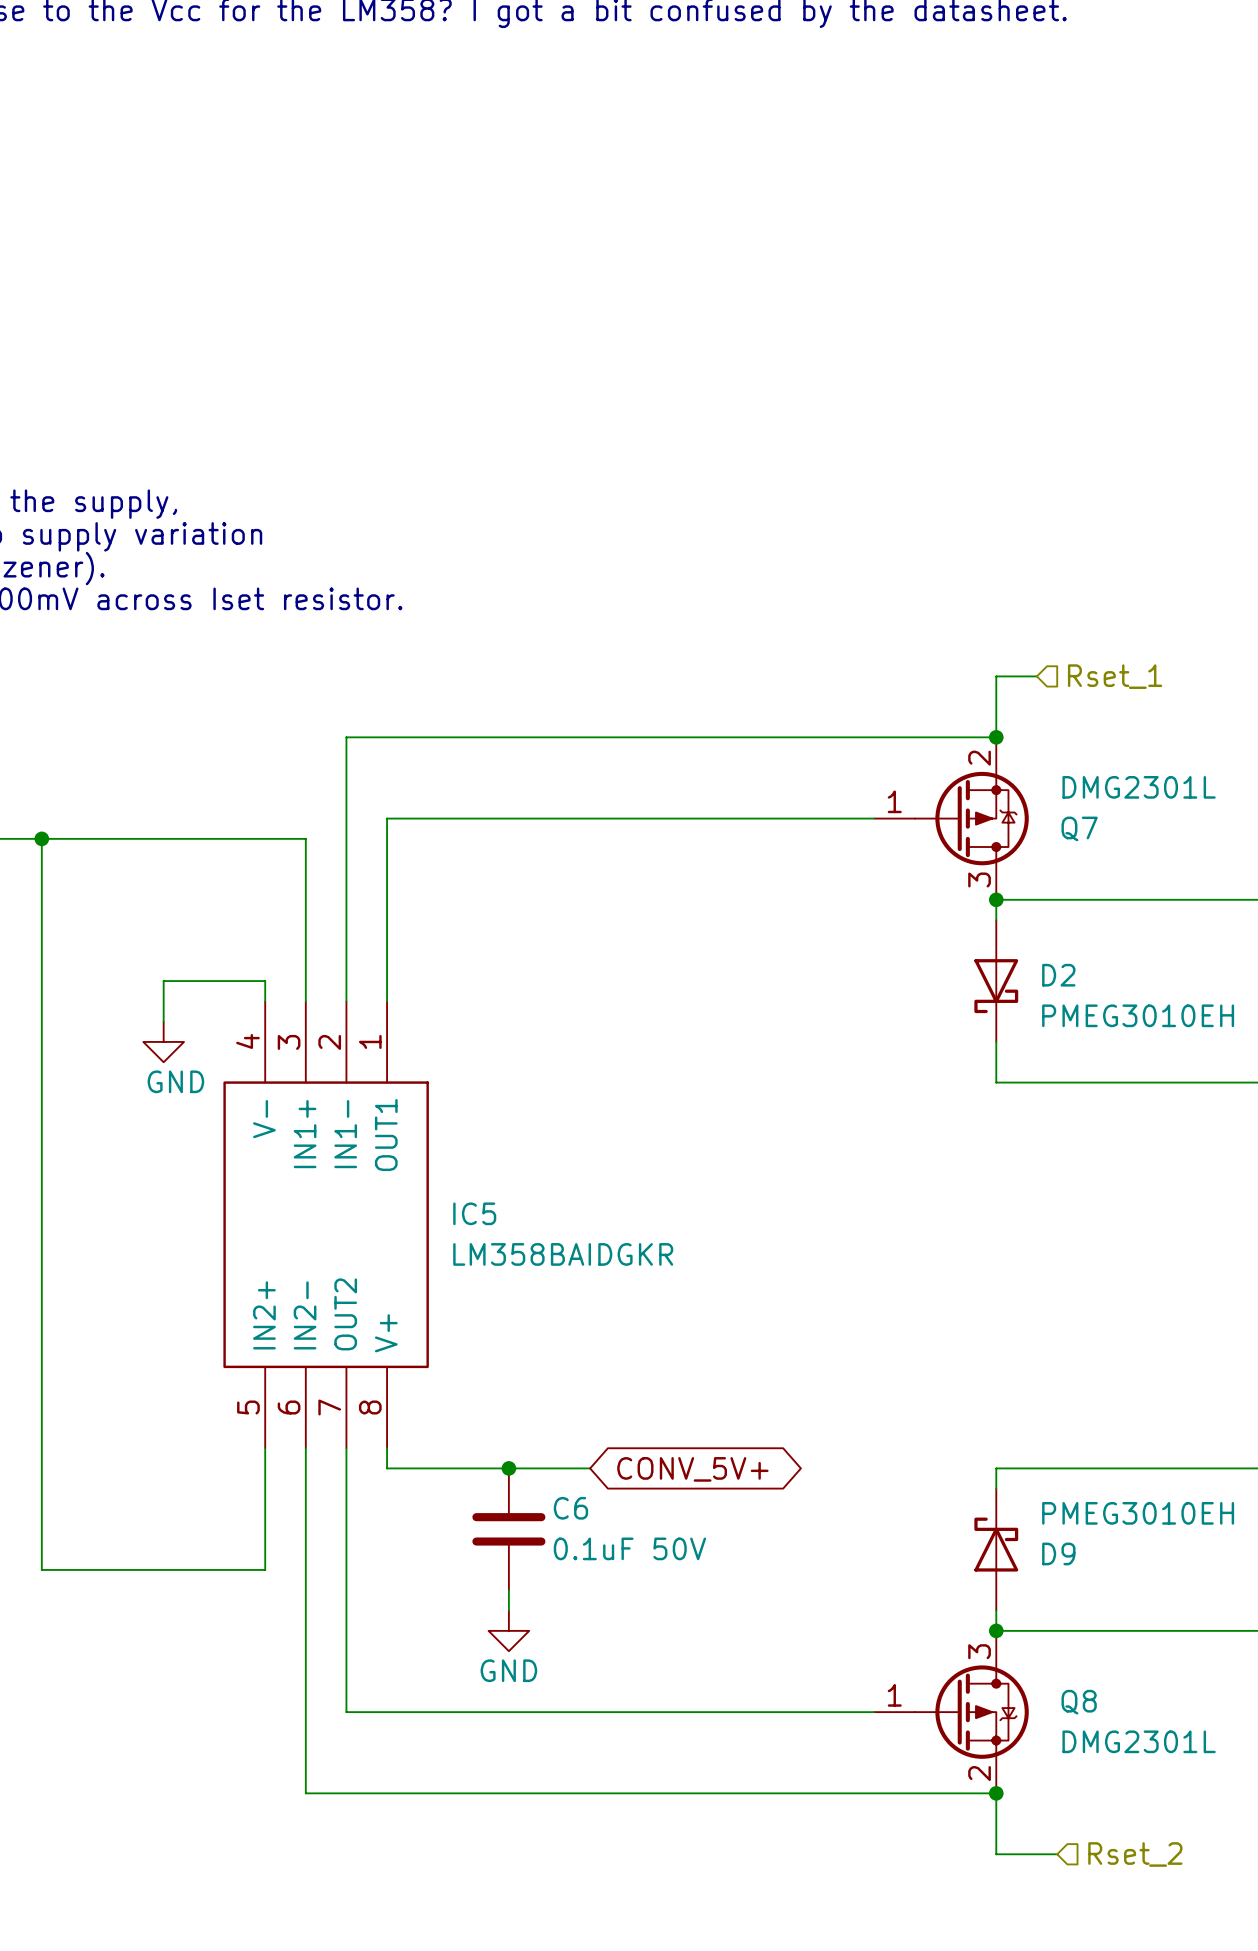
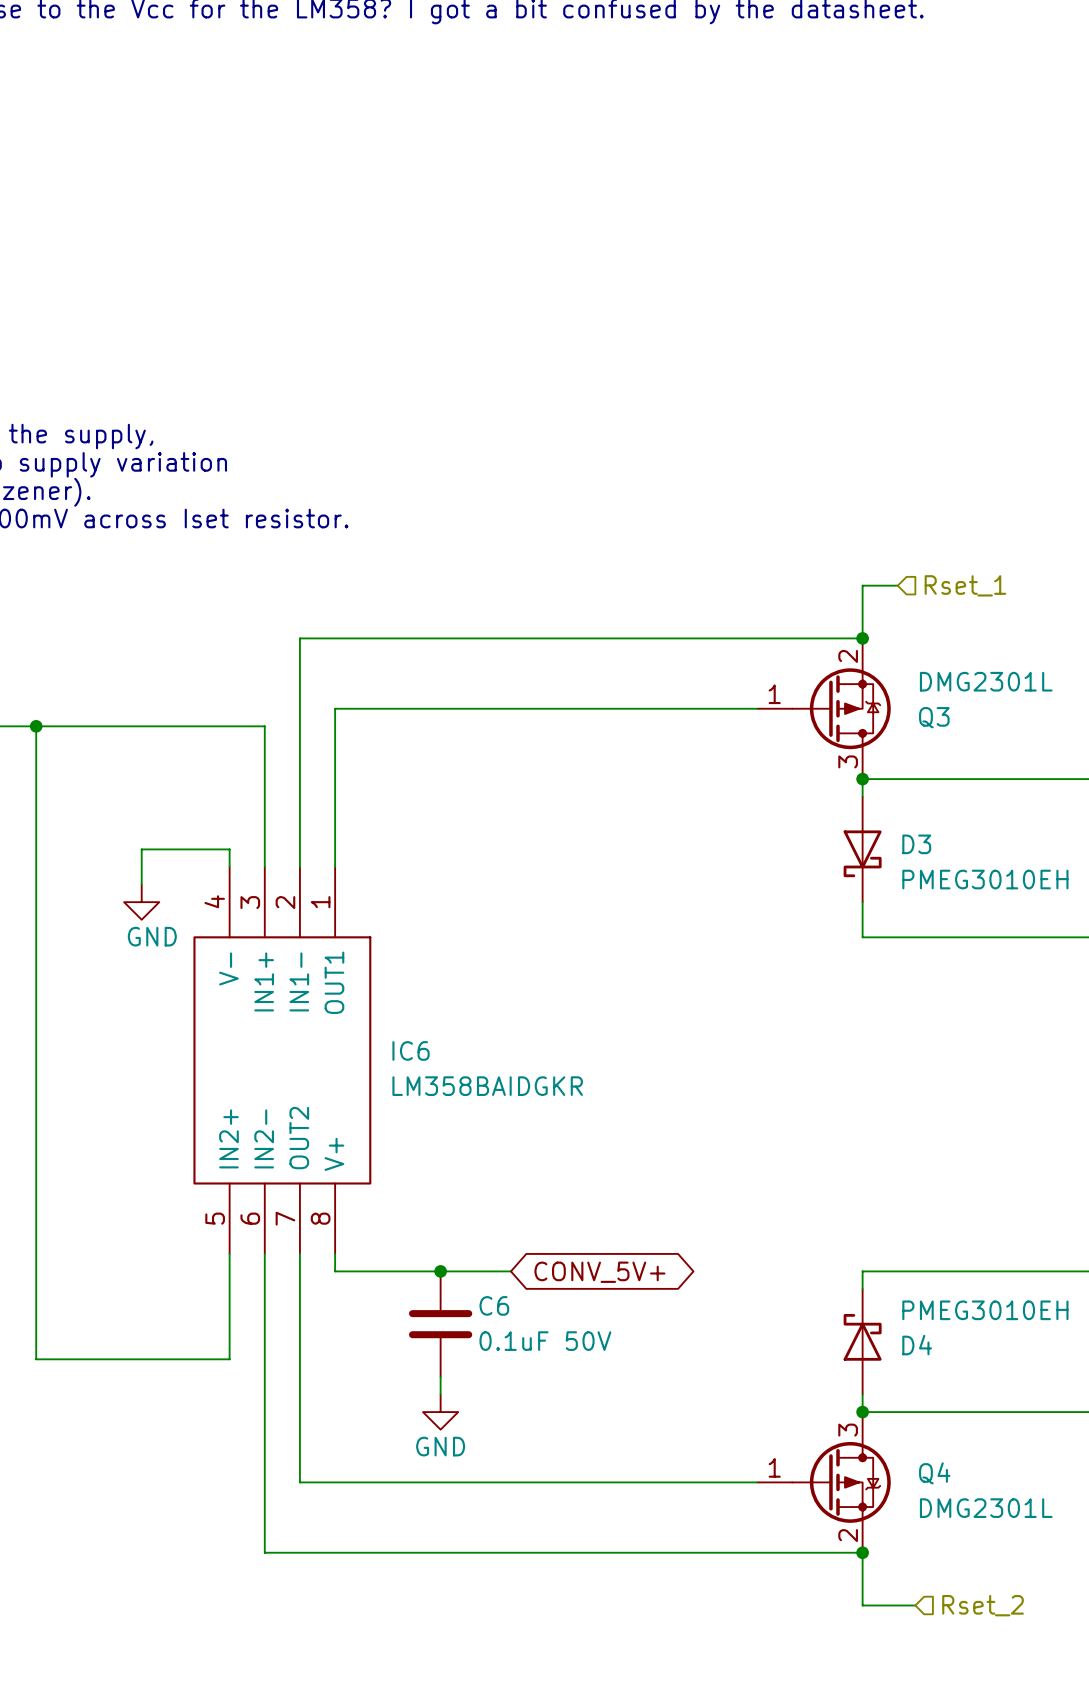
Q7 name: Q7 (1079, 828) -> Q3 (934, 717)
D2 name: D2 (1058, 975) -> D3 (916, 844)
IC5 name: IC5 (474, 1213) -> IC6 (411, 1050)
D9 name: D9 (1058, 1553) -> D4 (917, 1345)
Q8 name: Q8 (1079, 1702) -> Q4 (934, 1473)

